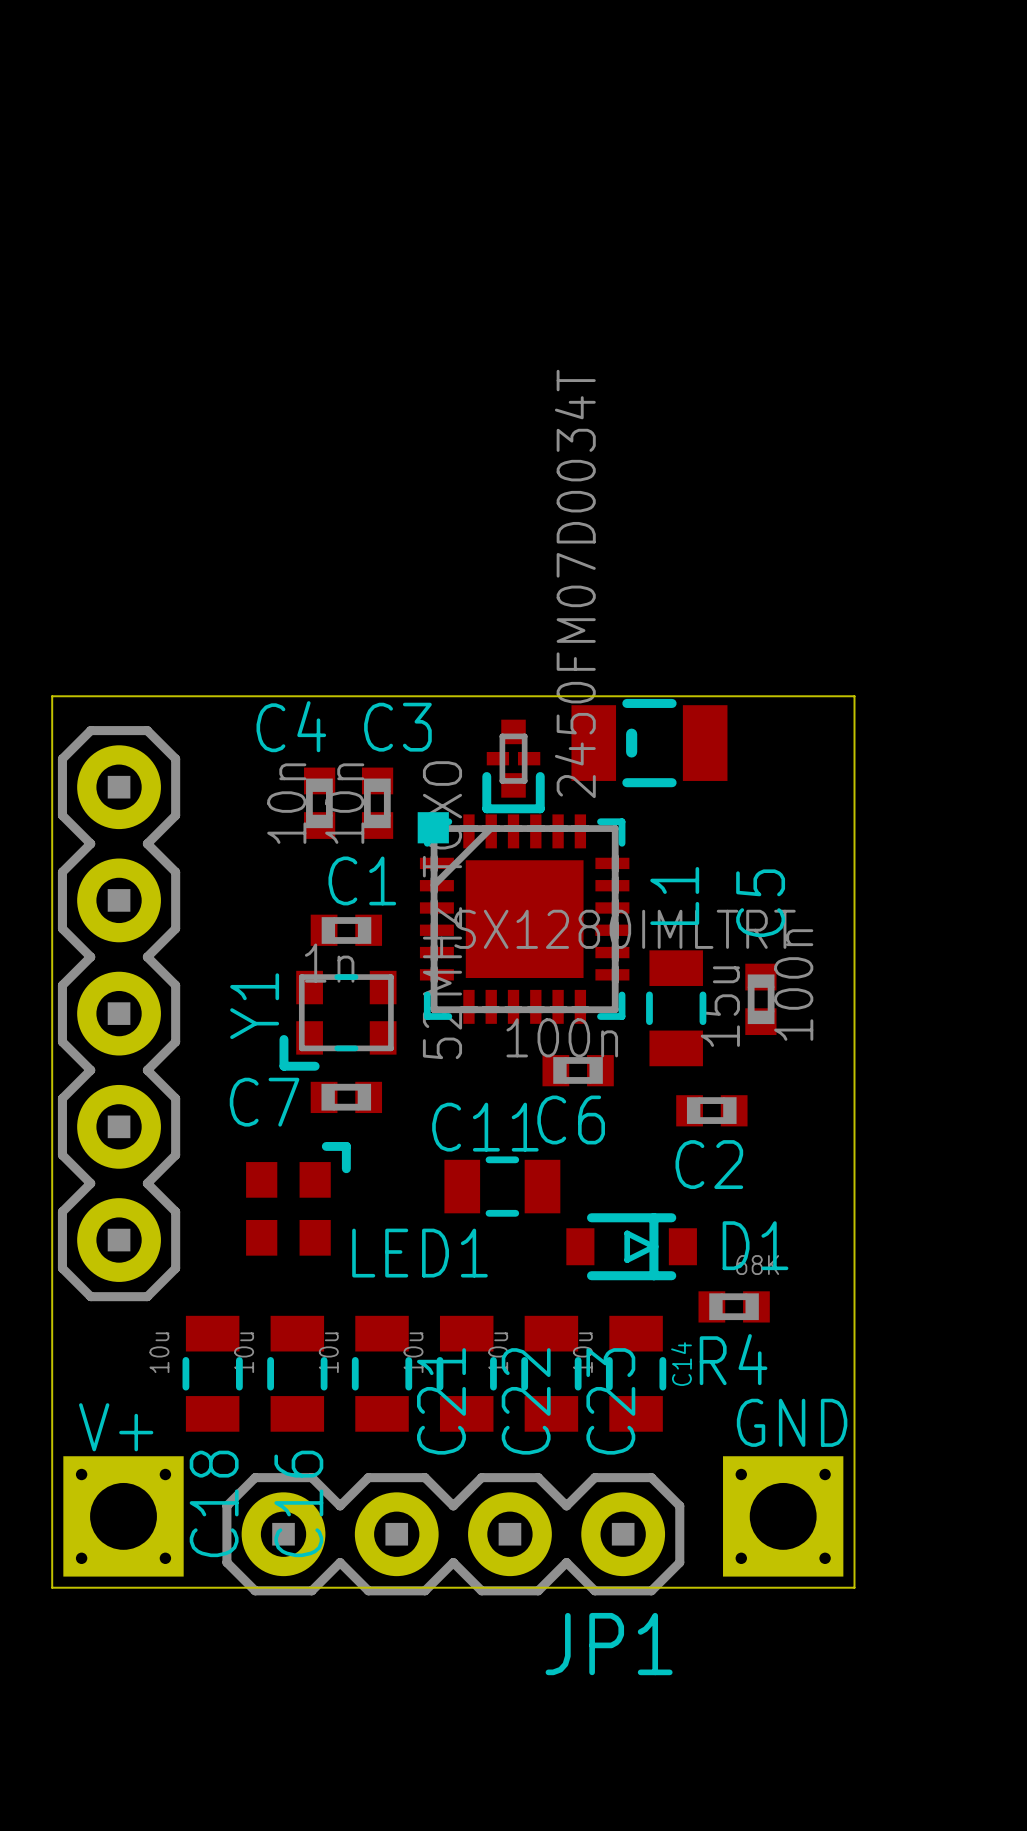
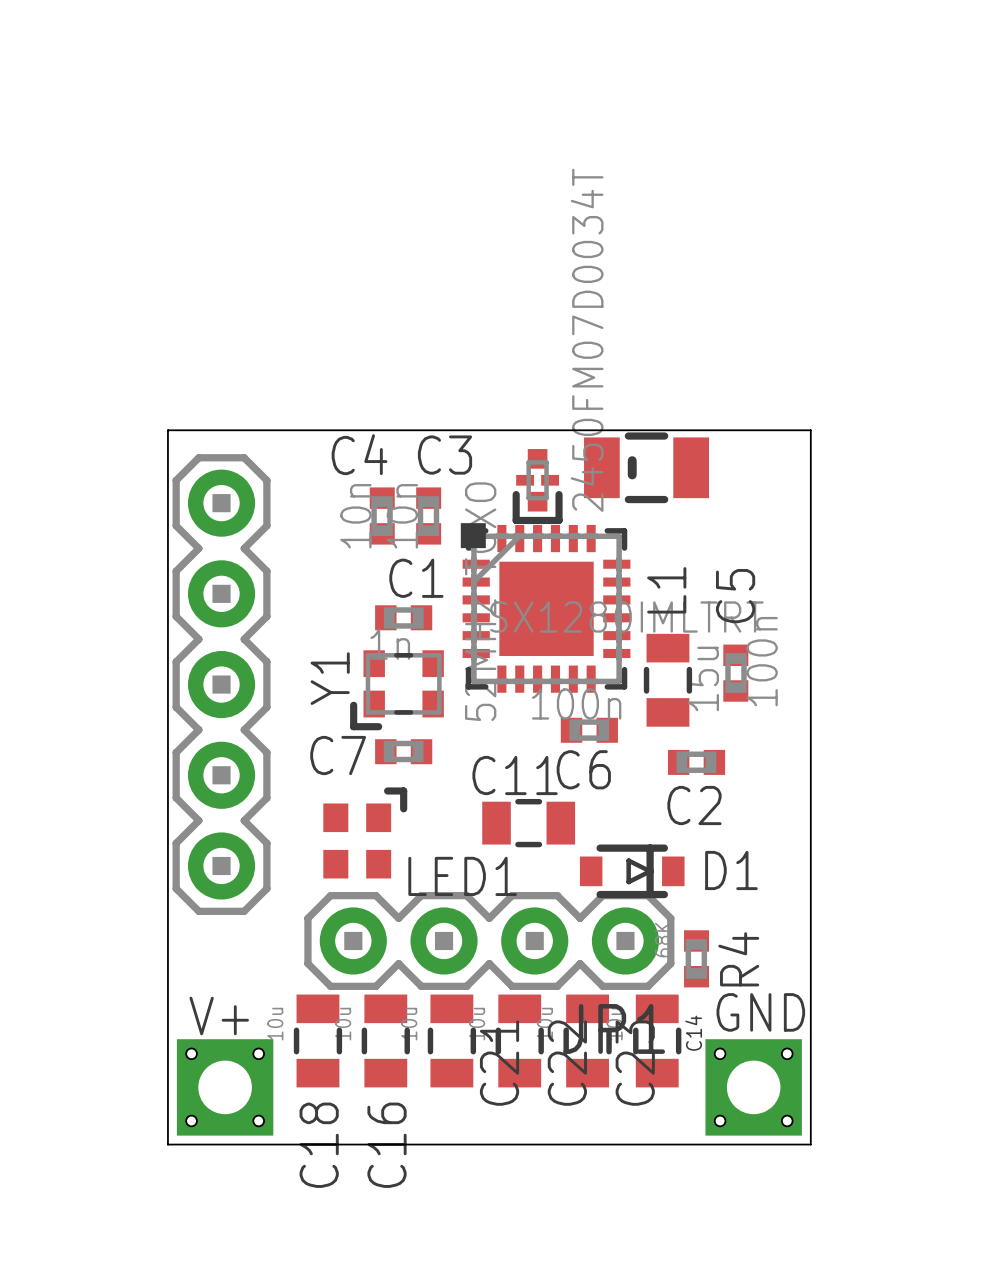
R4 rotation: 0° (734, 1306) -> 90° clockwise (696, 958)
R4 position: (734, 1306) -> (696, 958)
C18 position: (212, 1373) -> (317, 1040)
C16 position: (297, 1373) -> (385, 1040)
C21 position: (382, 1373) -> (451, 1040)
C22 position: (466, 1373) -> (519, 1040)
C23 position: (551, 1373) -> (587, 1040)
C14 position: (636, 1373) -> (657, 1040)
JP1 position: (453, 1534) -> (489, 940)

